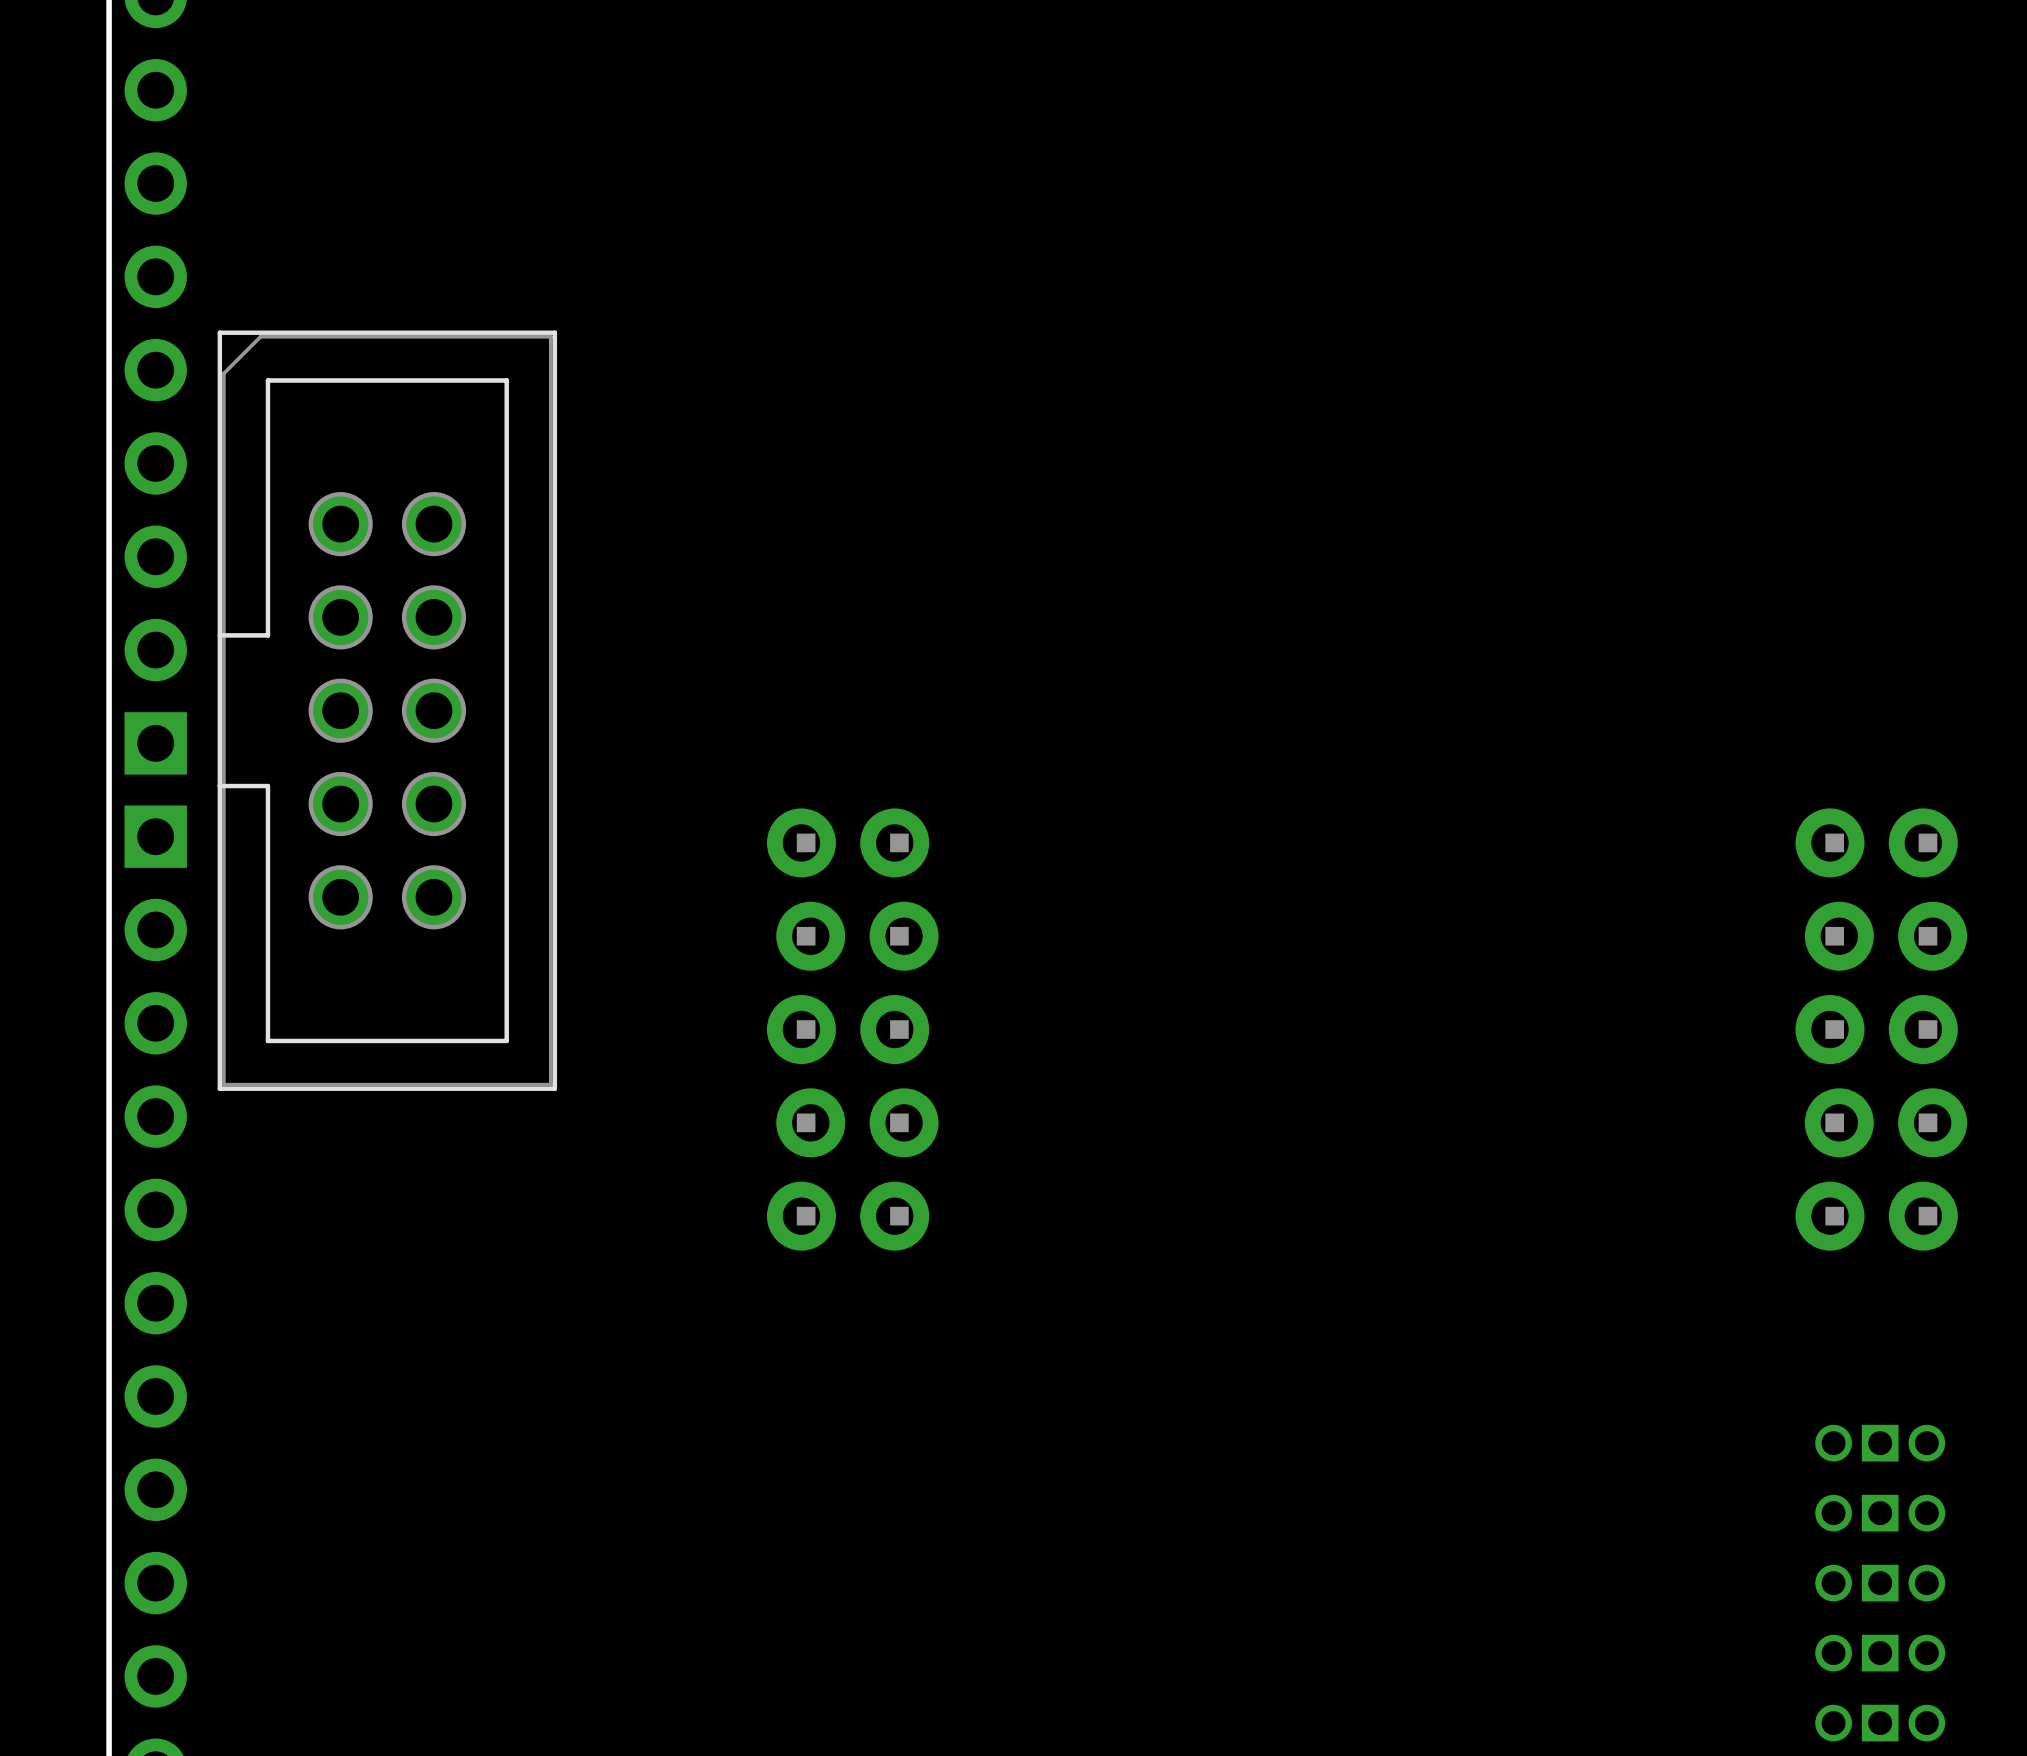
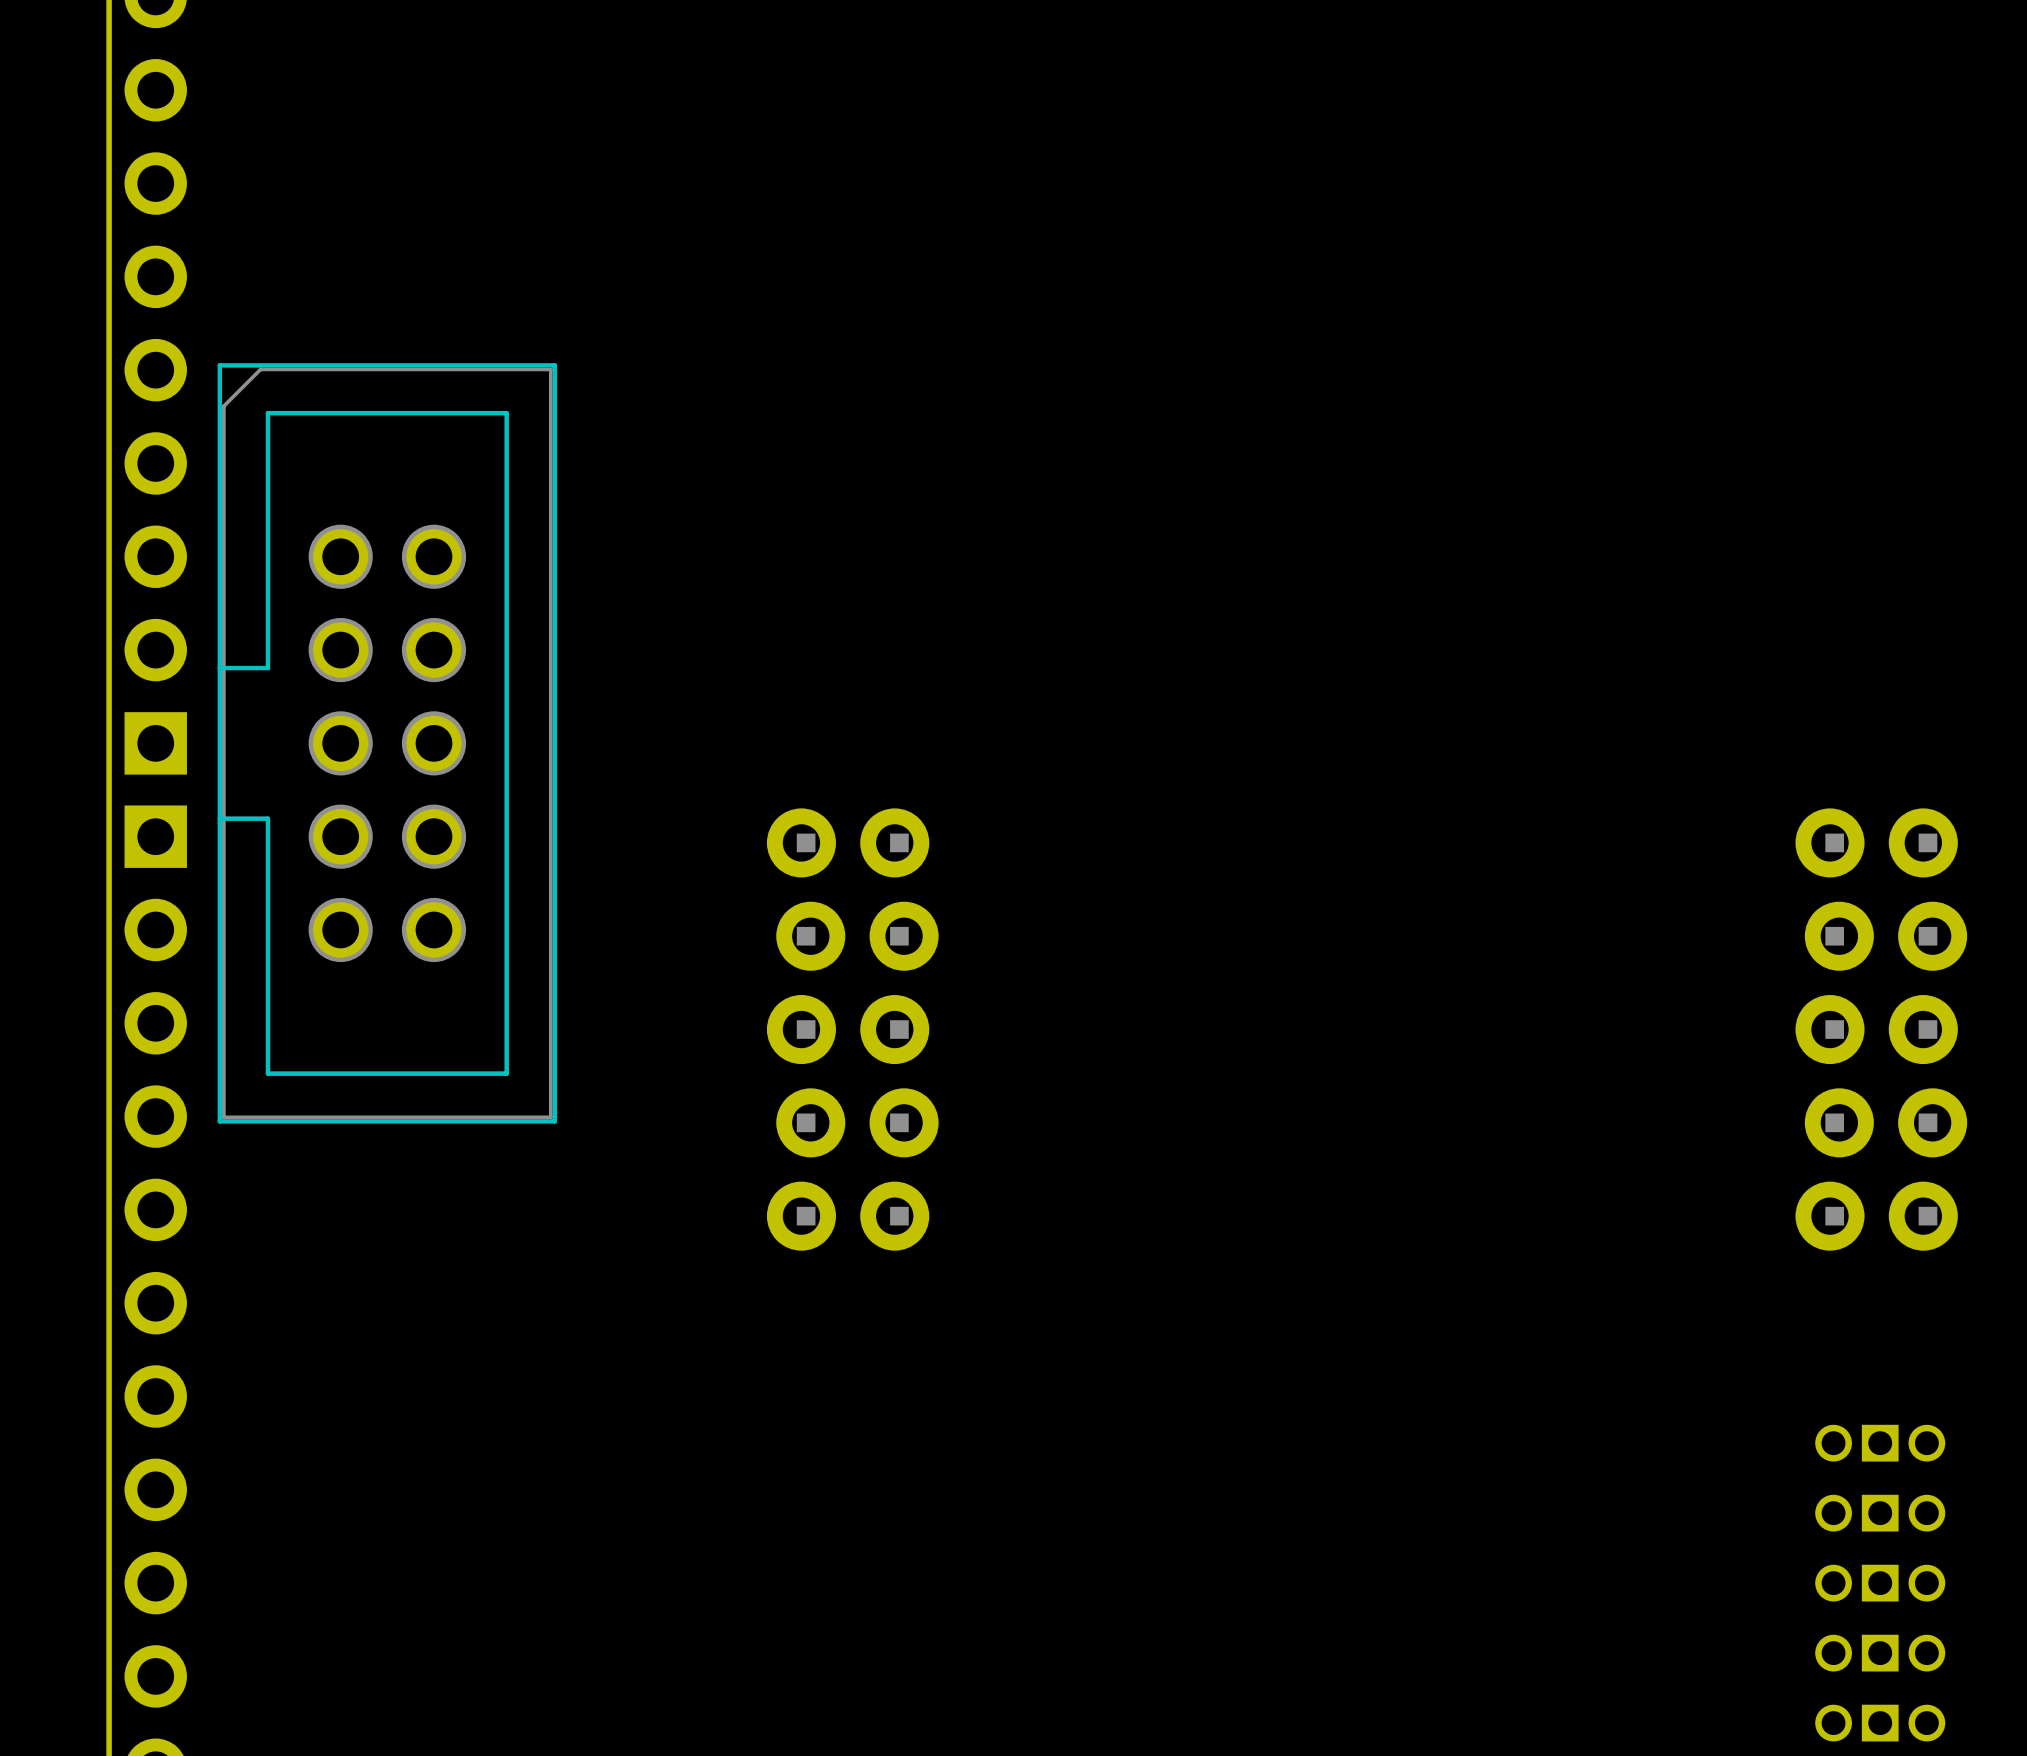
part position: (387, 710) -> (387, 743)

